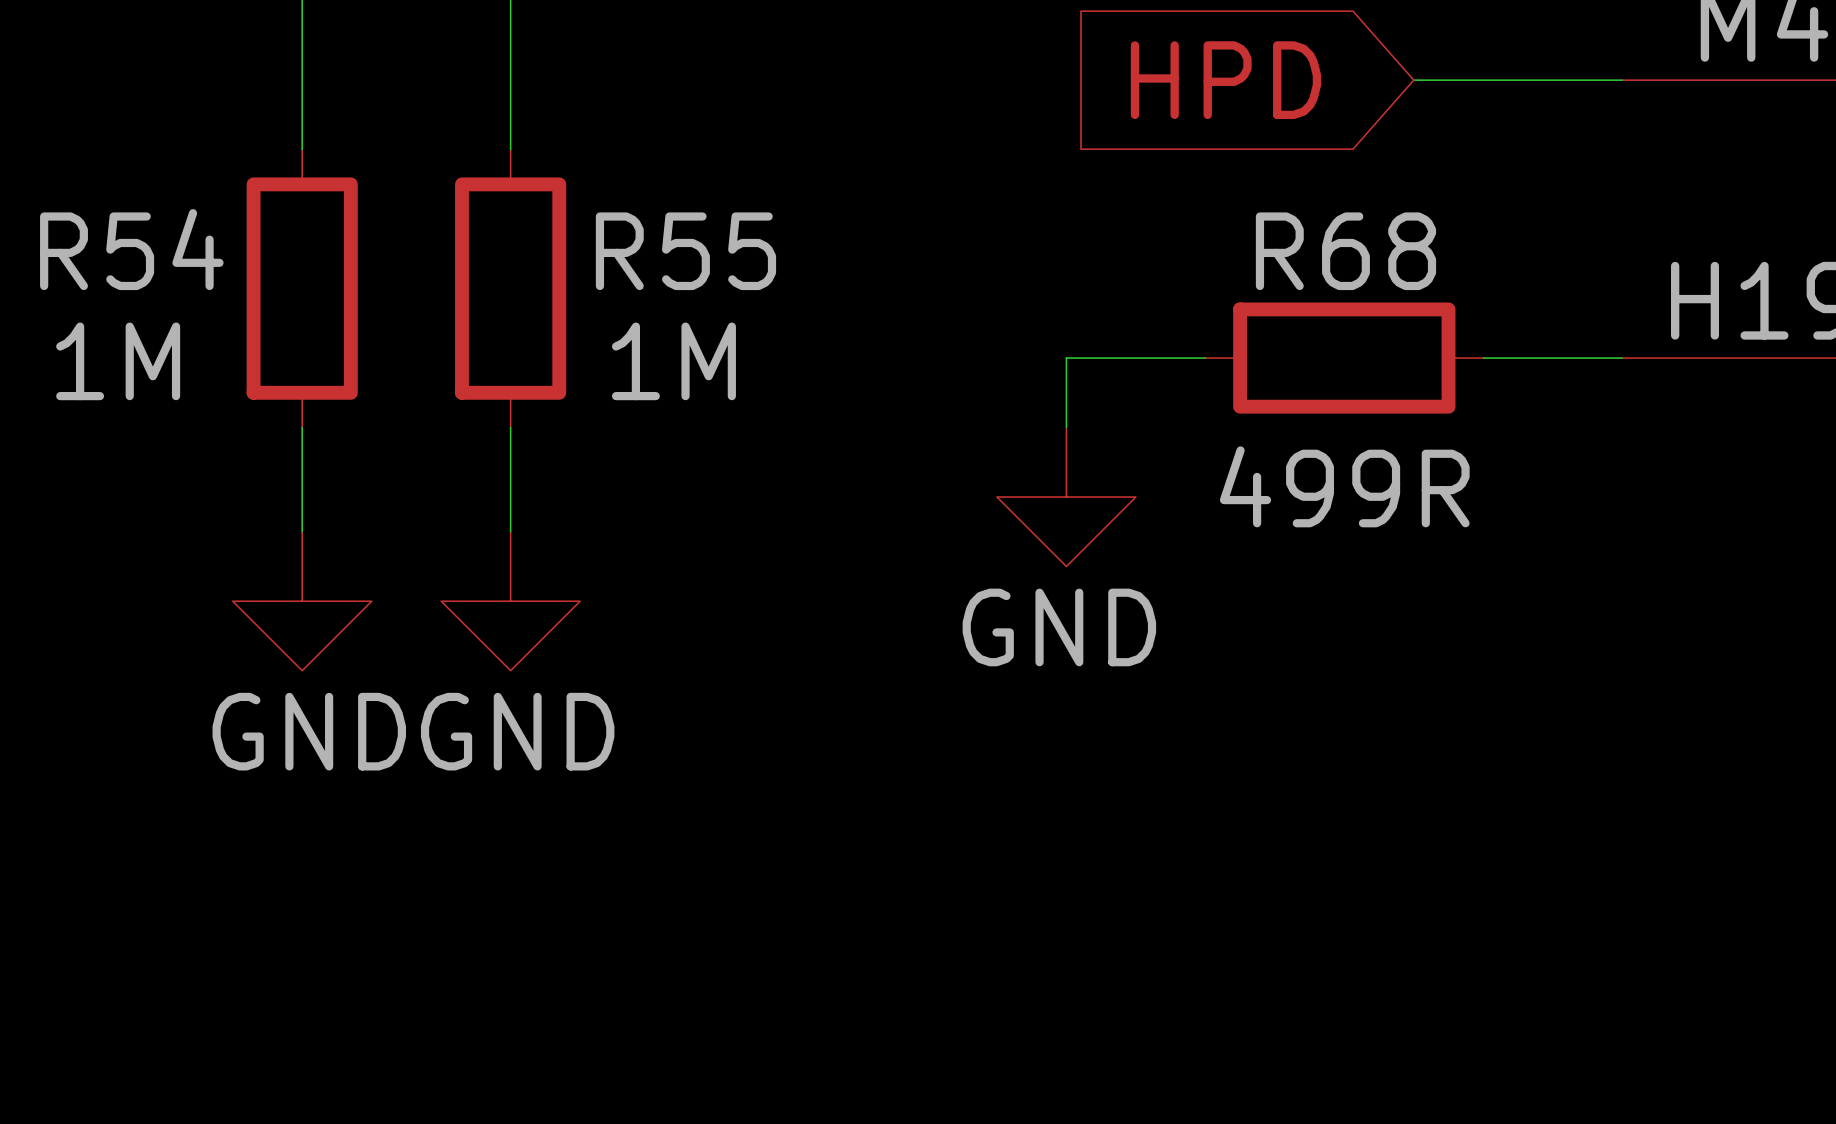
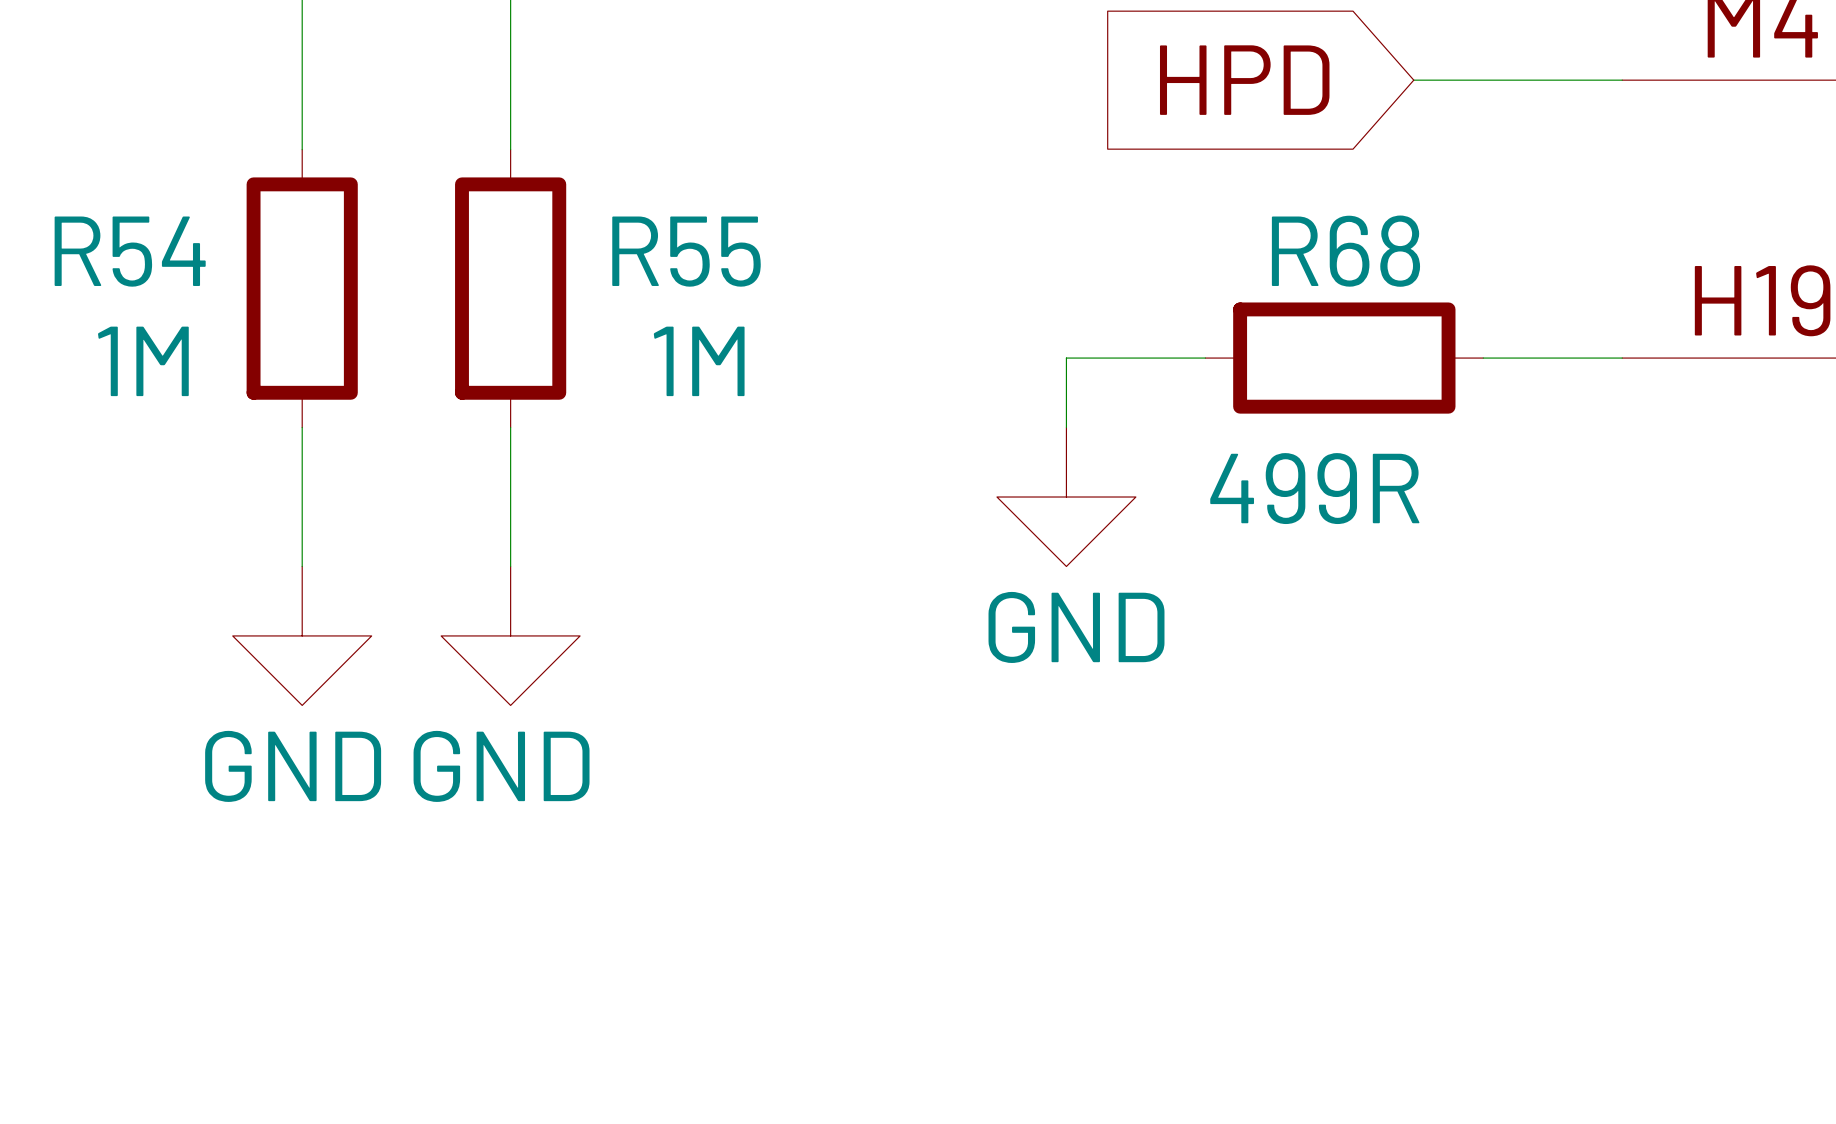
power symbol position: GND (302, 601) -> GND (302, 635)
power symbol position: GND (510, 601) -> GND (510, 635)

